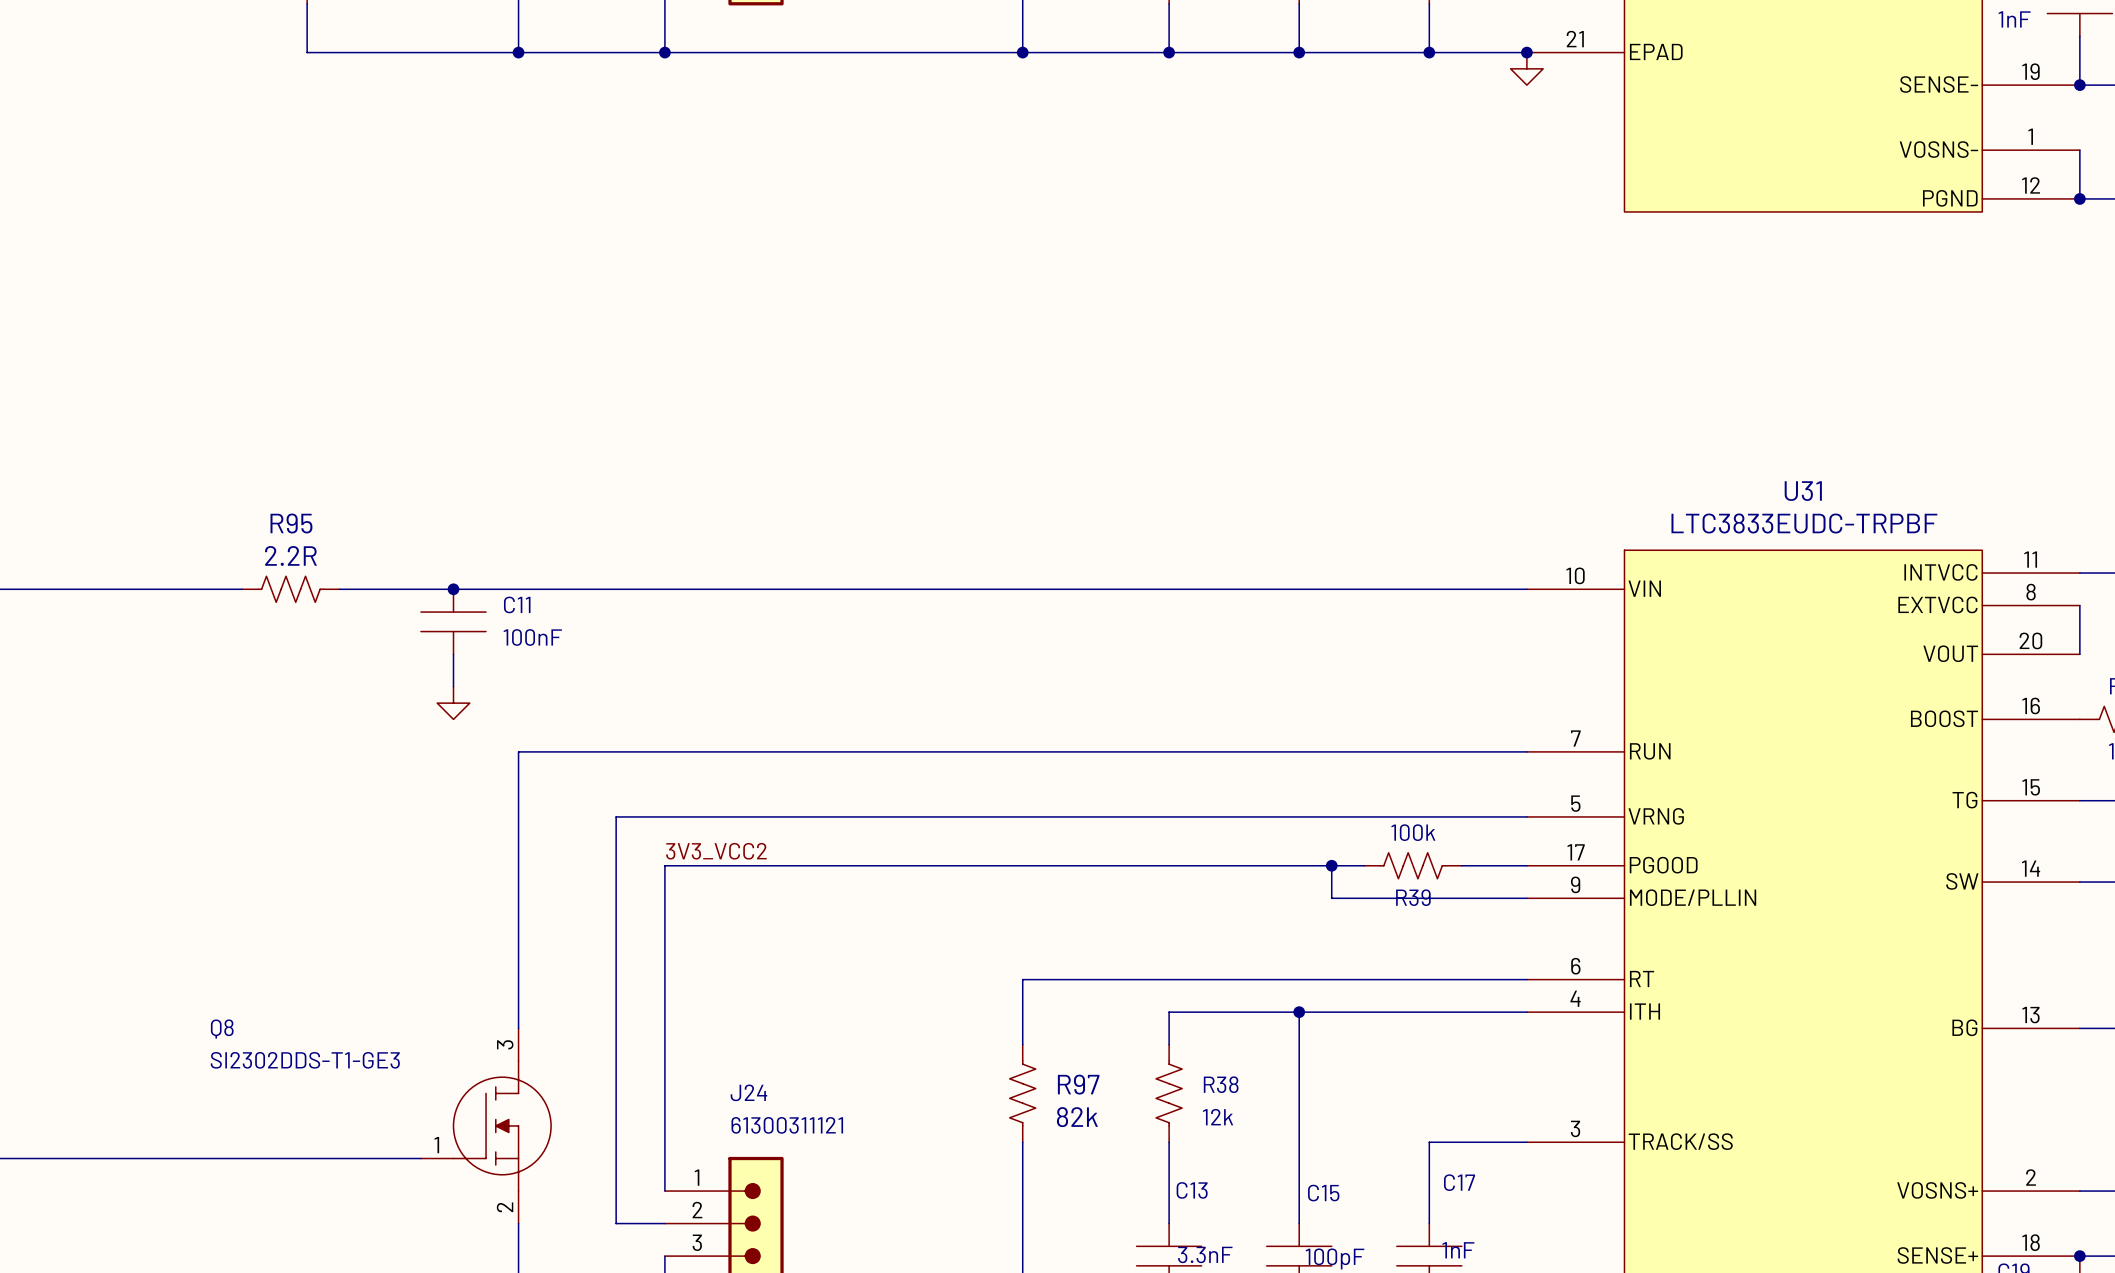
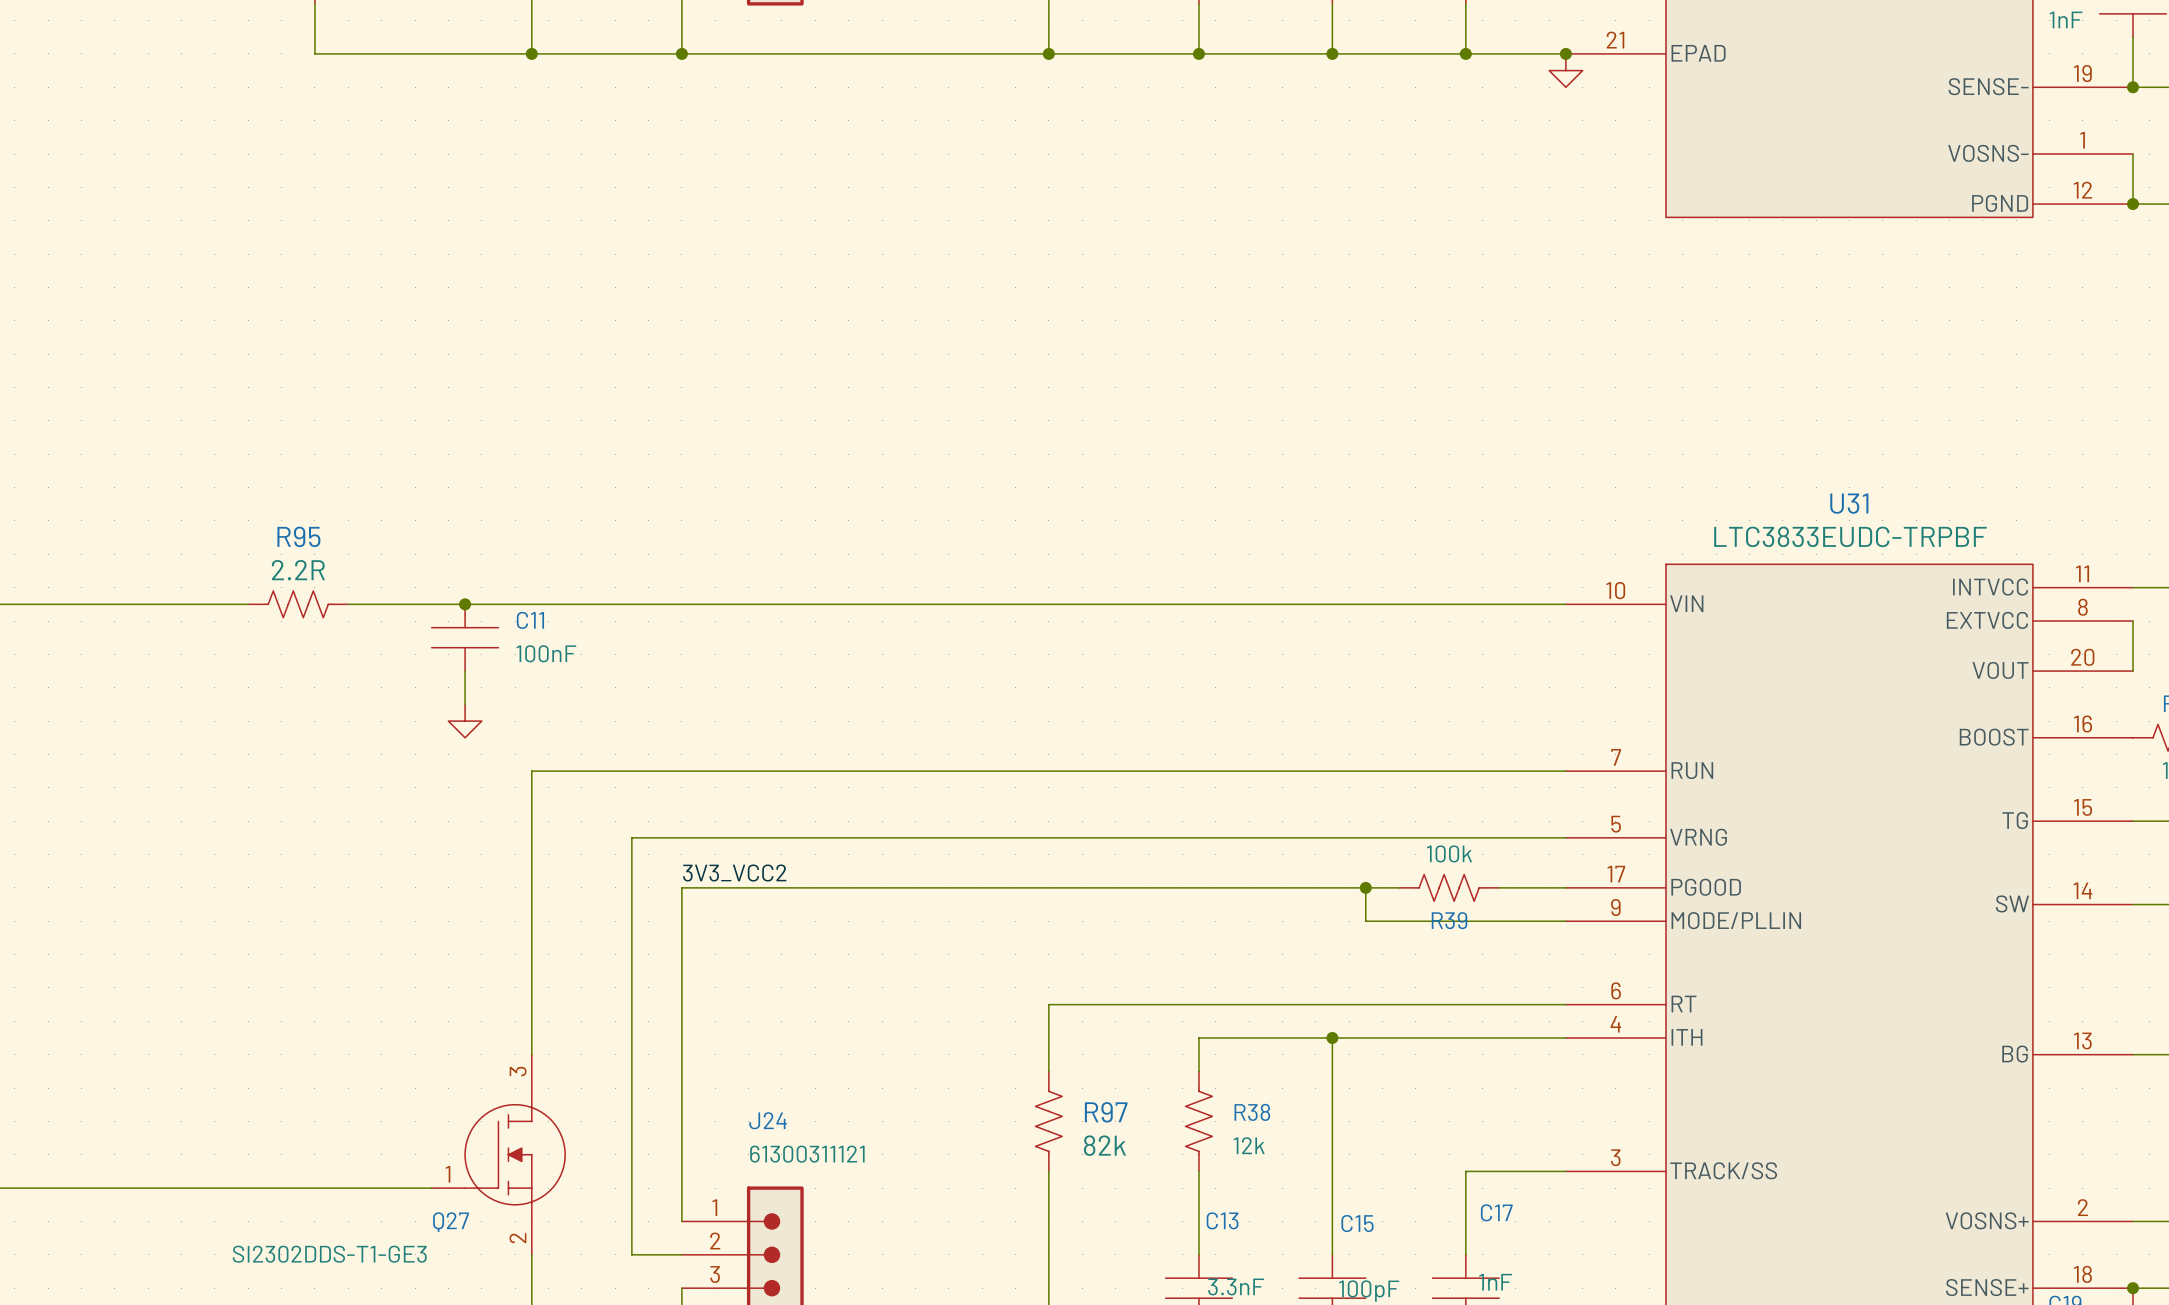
Q8 name: Q8 (222, 1029) -> Q27 (451, 1222)
Q8 value position: SI2302DDS-T1-GE3 (305, 1060) -> SI2302DDS-T1-GE3 (329, 1254)

